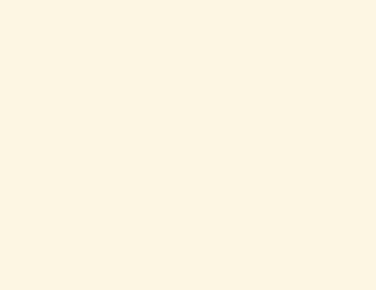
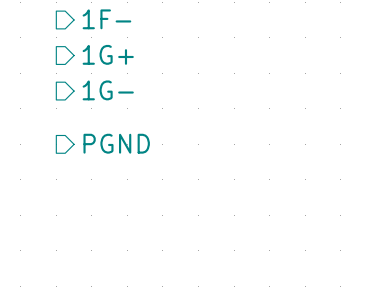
sheet pin: none -> 1F- (106, 19)
sheet pin: none -> 1G+ (108, 54)
sheet pin: none -> 1G- (108, 90)
sheet pin: none -> PGND (116, 143)

